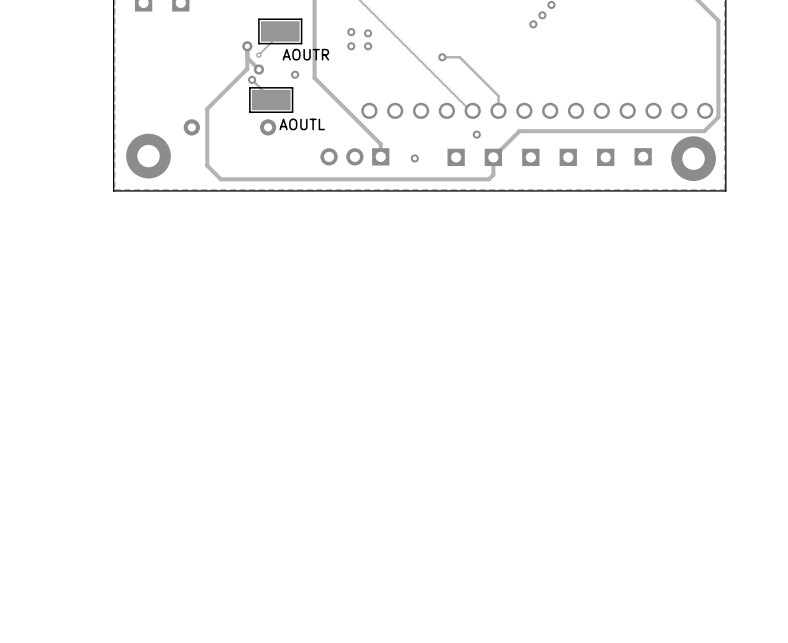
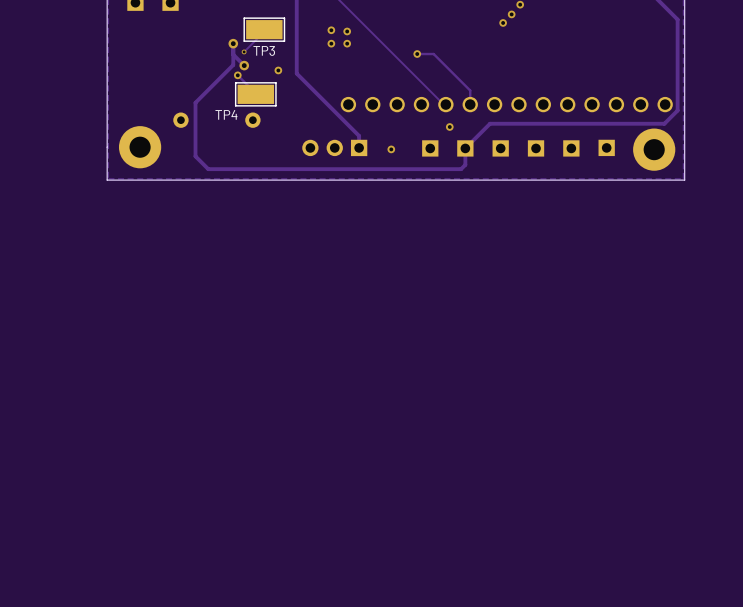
TP3 name: none -> TP3 (264, 50)
text: AOUTR (305, 54) -> none
TP4 name: none -> TP4 (226, 114)
text: AOUTL (302, 124) -> none

